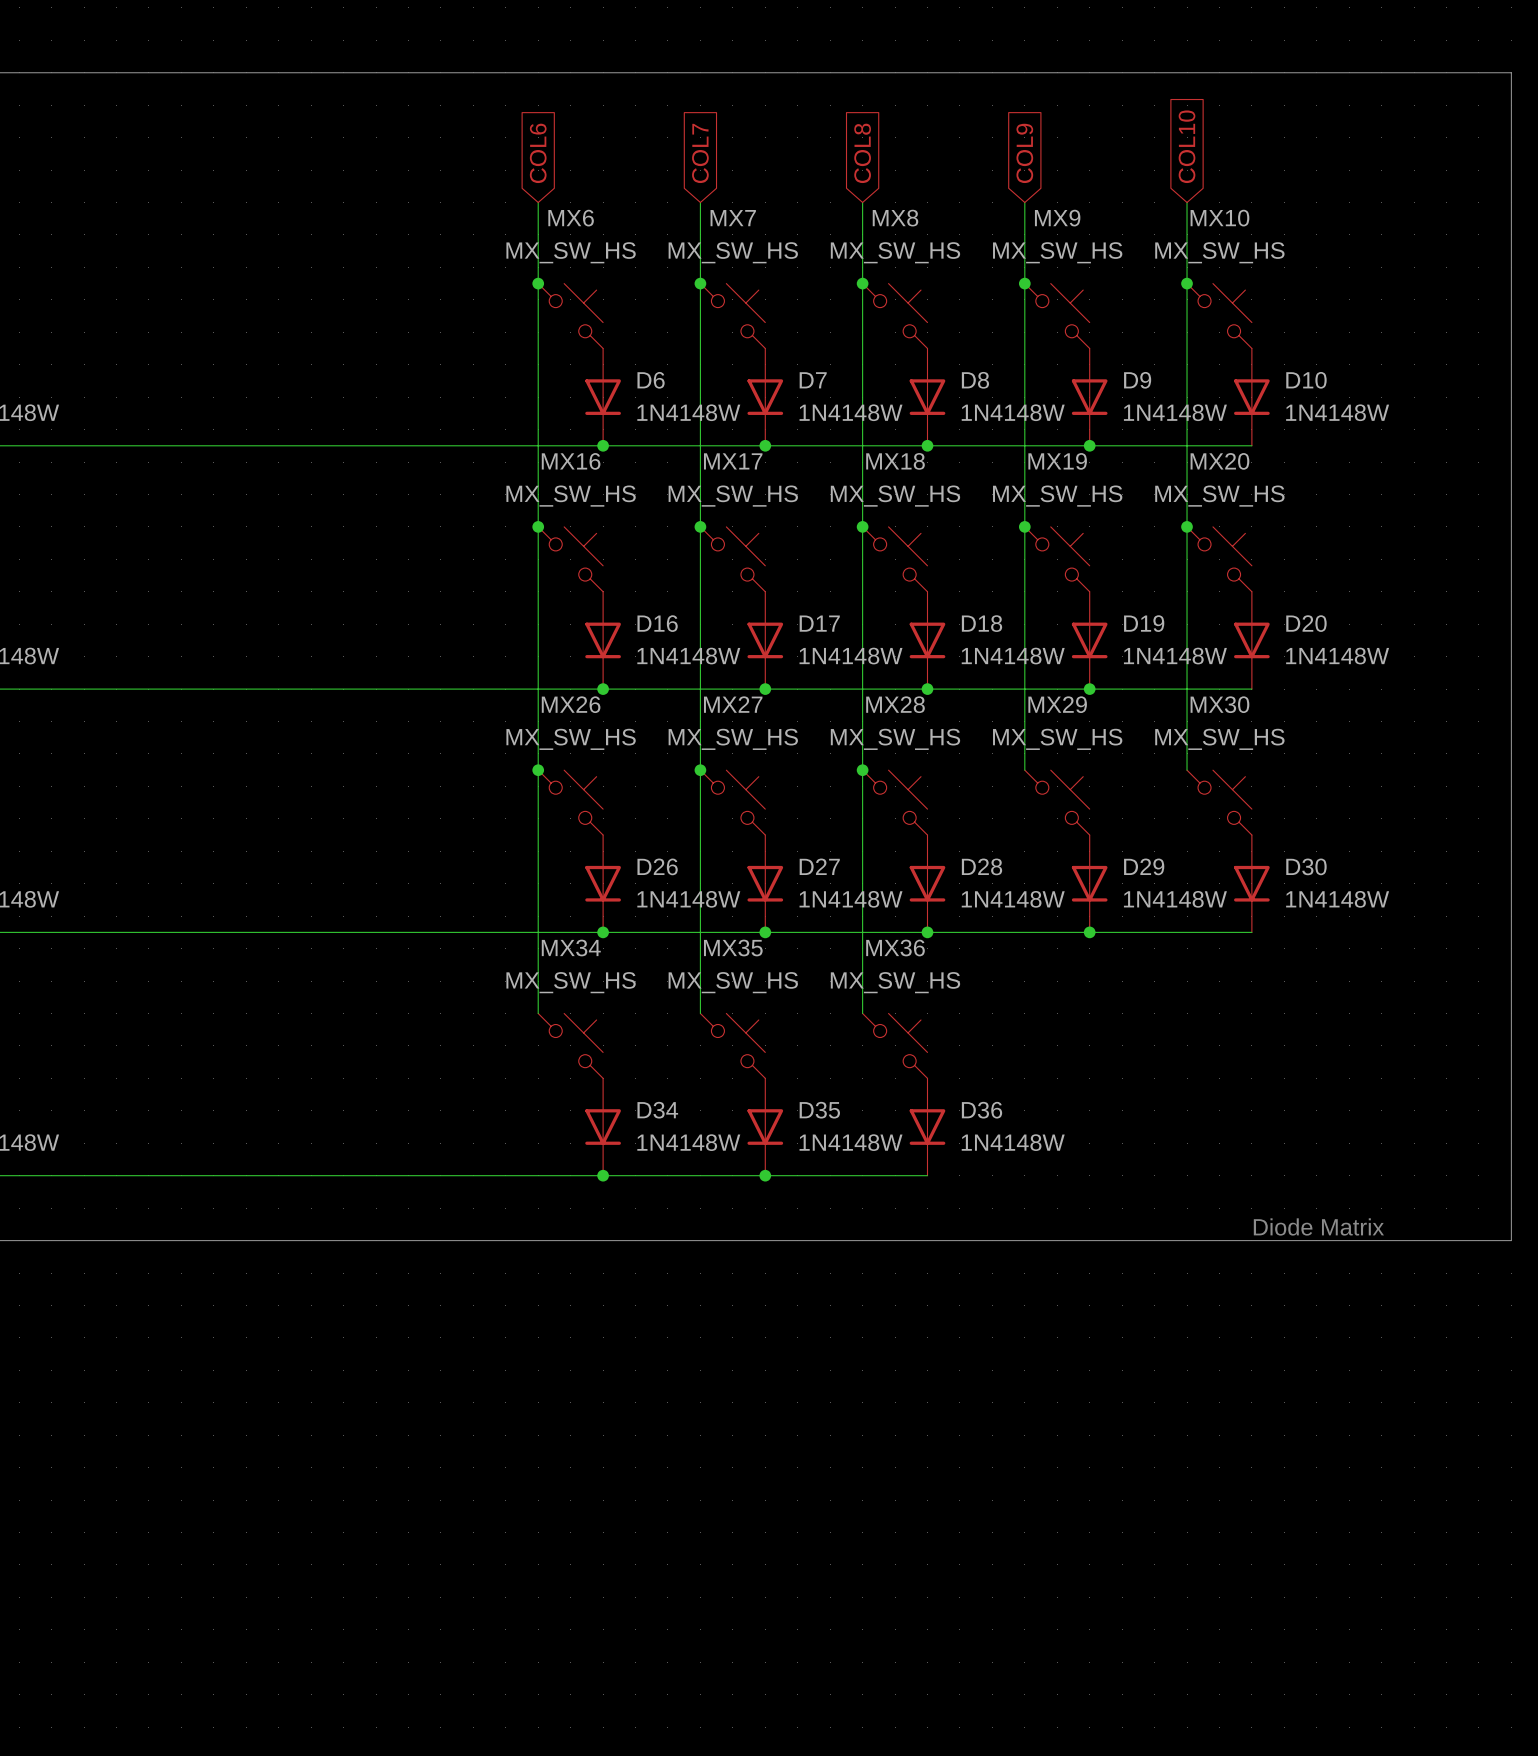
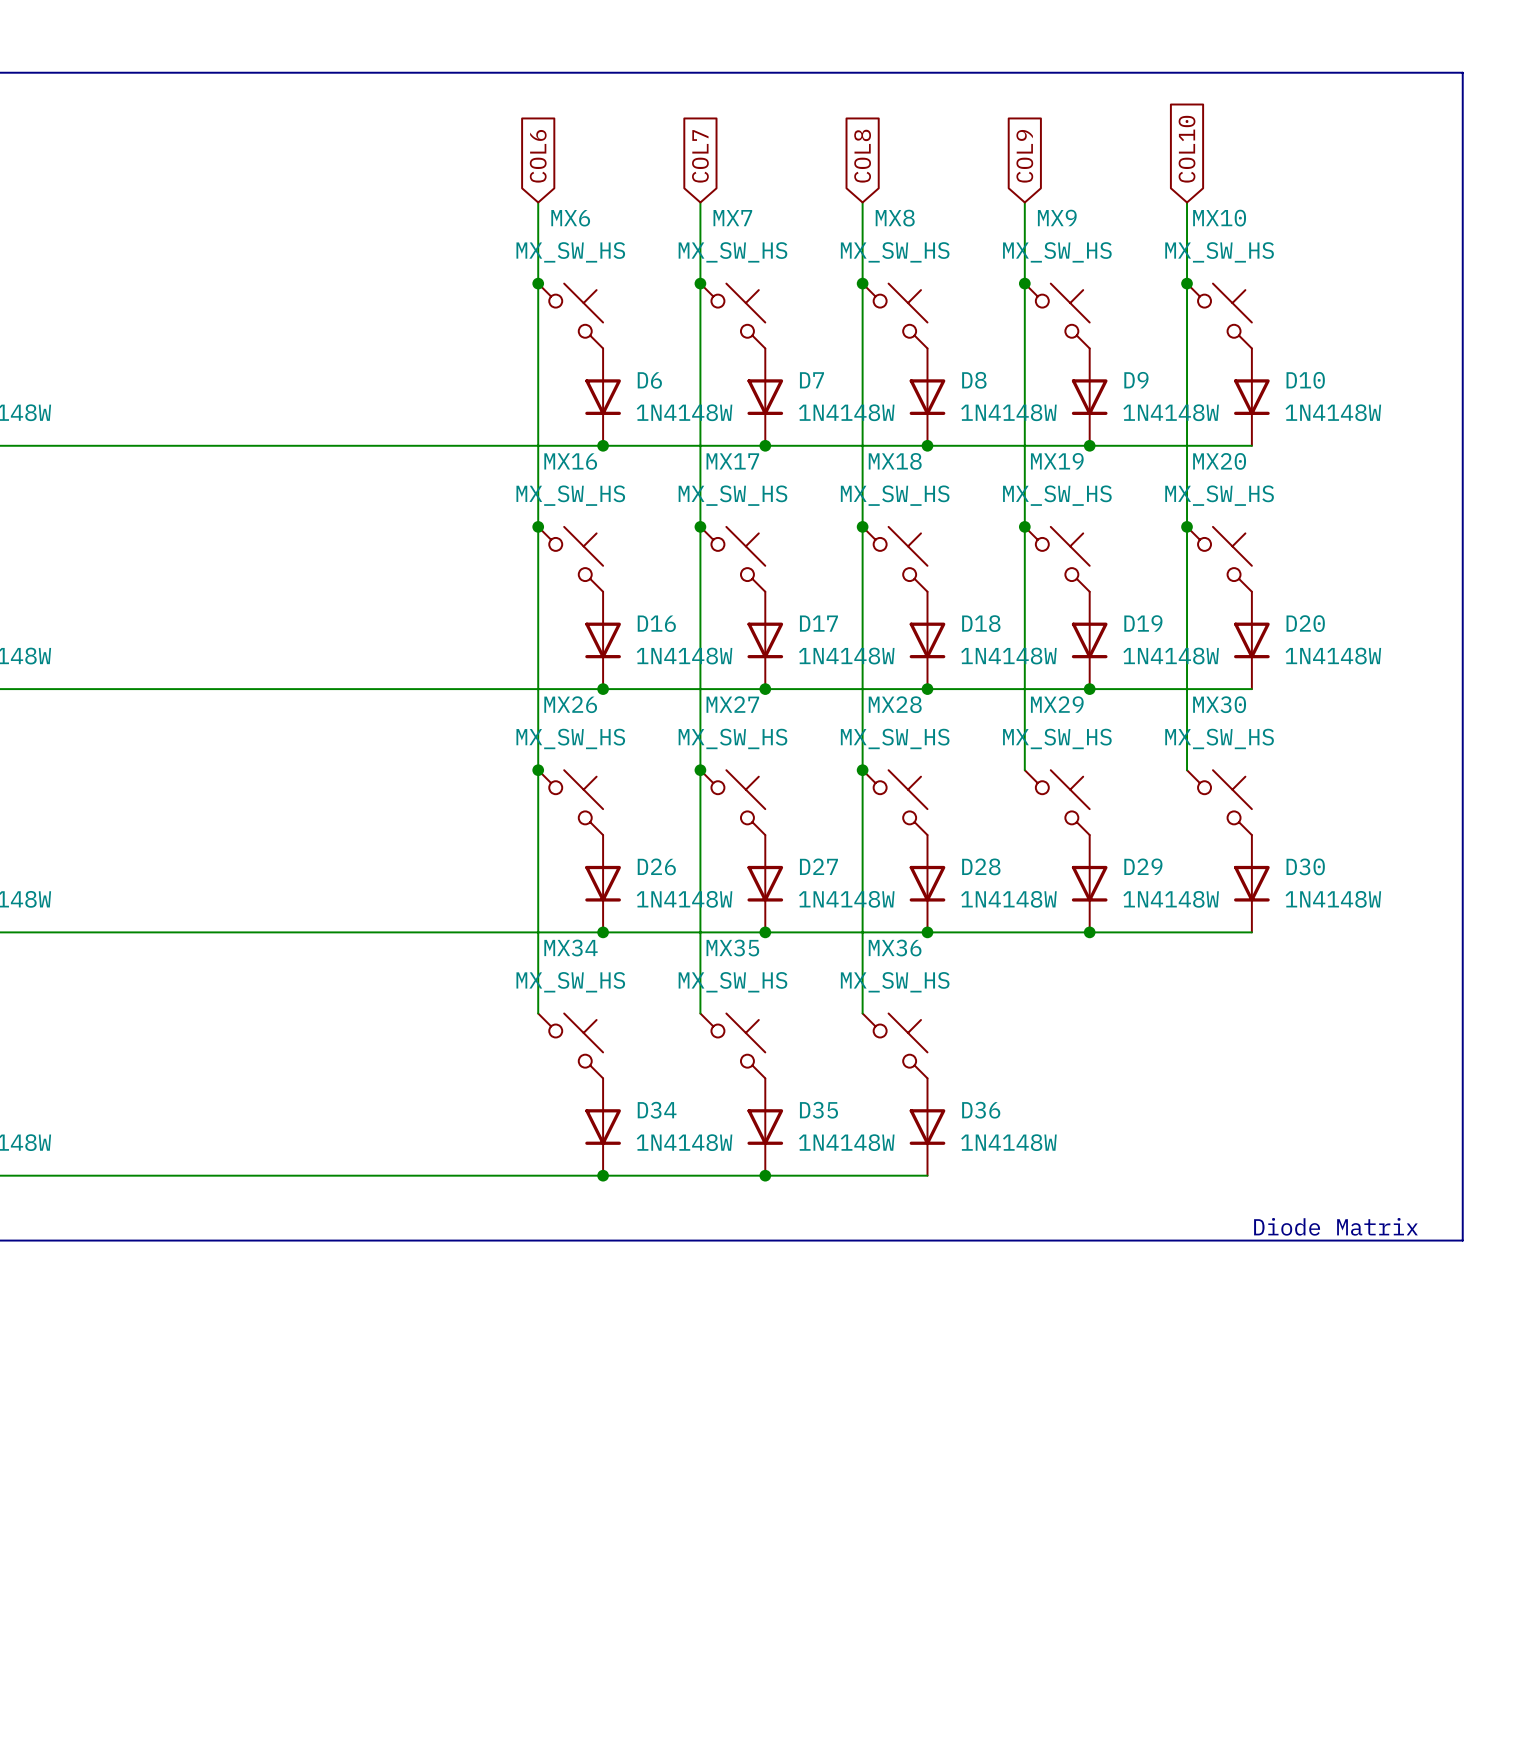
line: (1462, 72) (1511, 72) (1511, 1240) (1462, 1240) -> (1462, 72) (1462, 1240)

